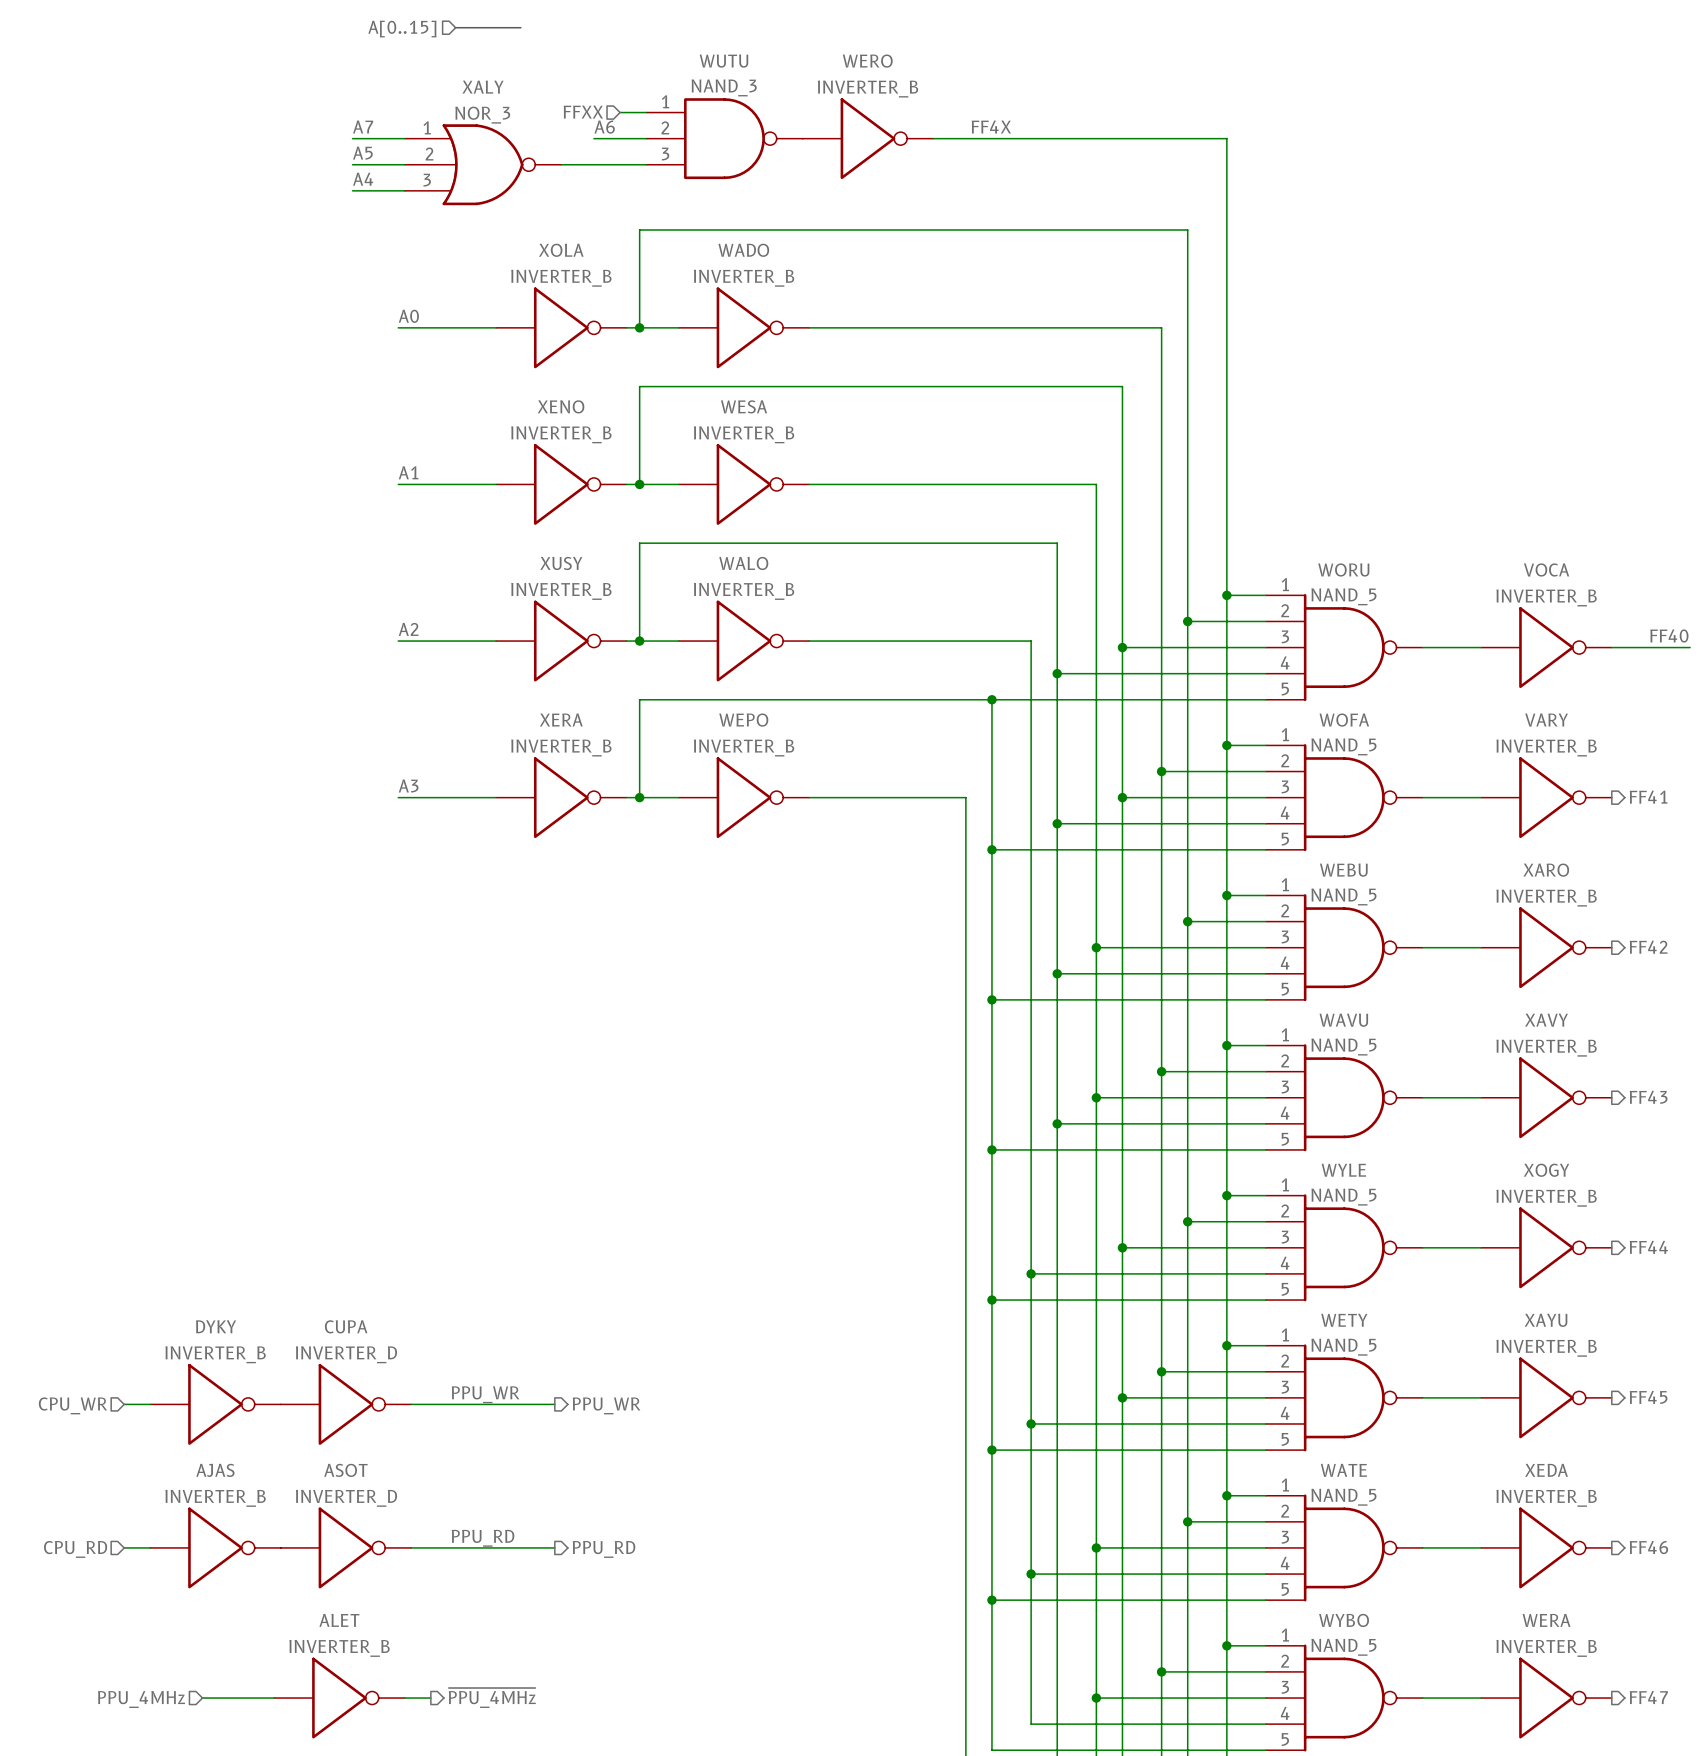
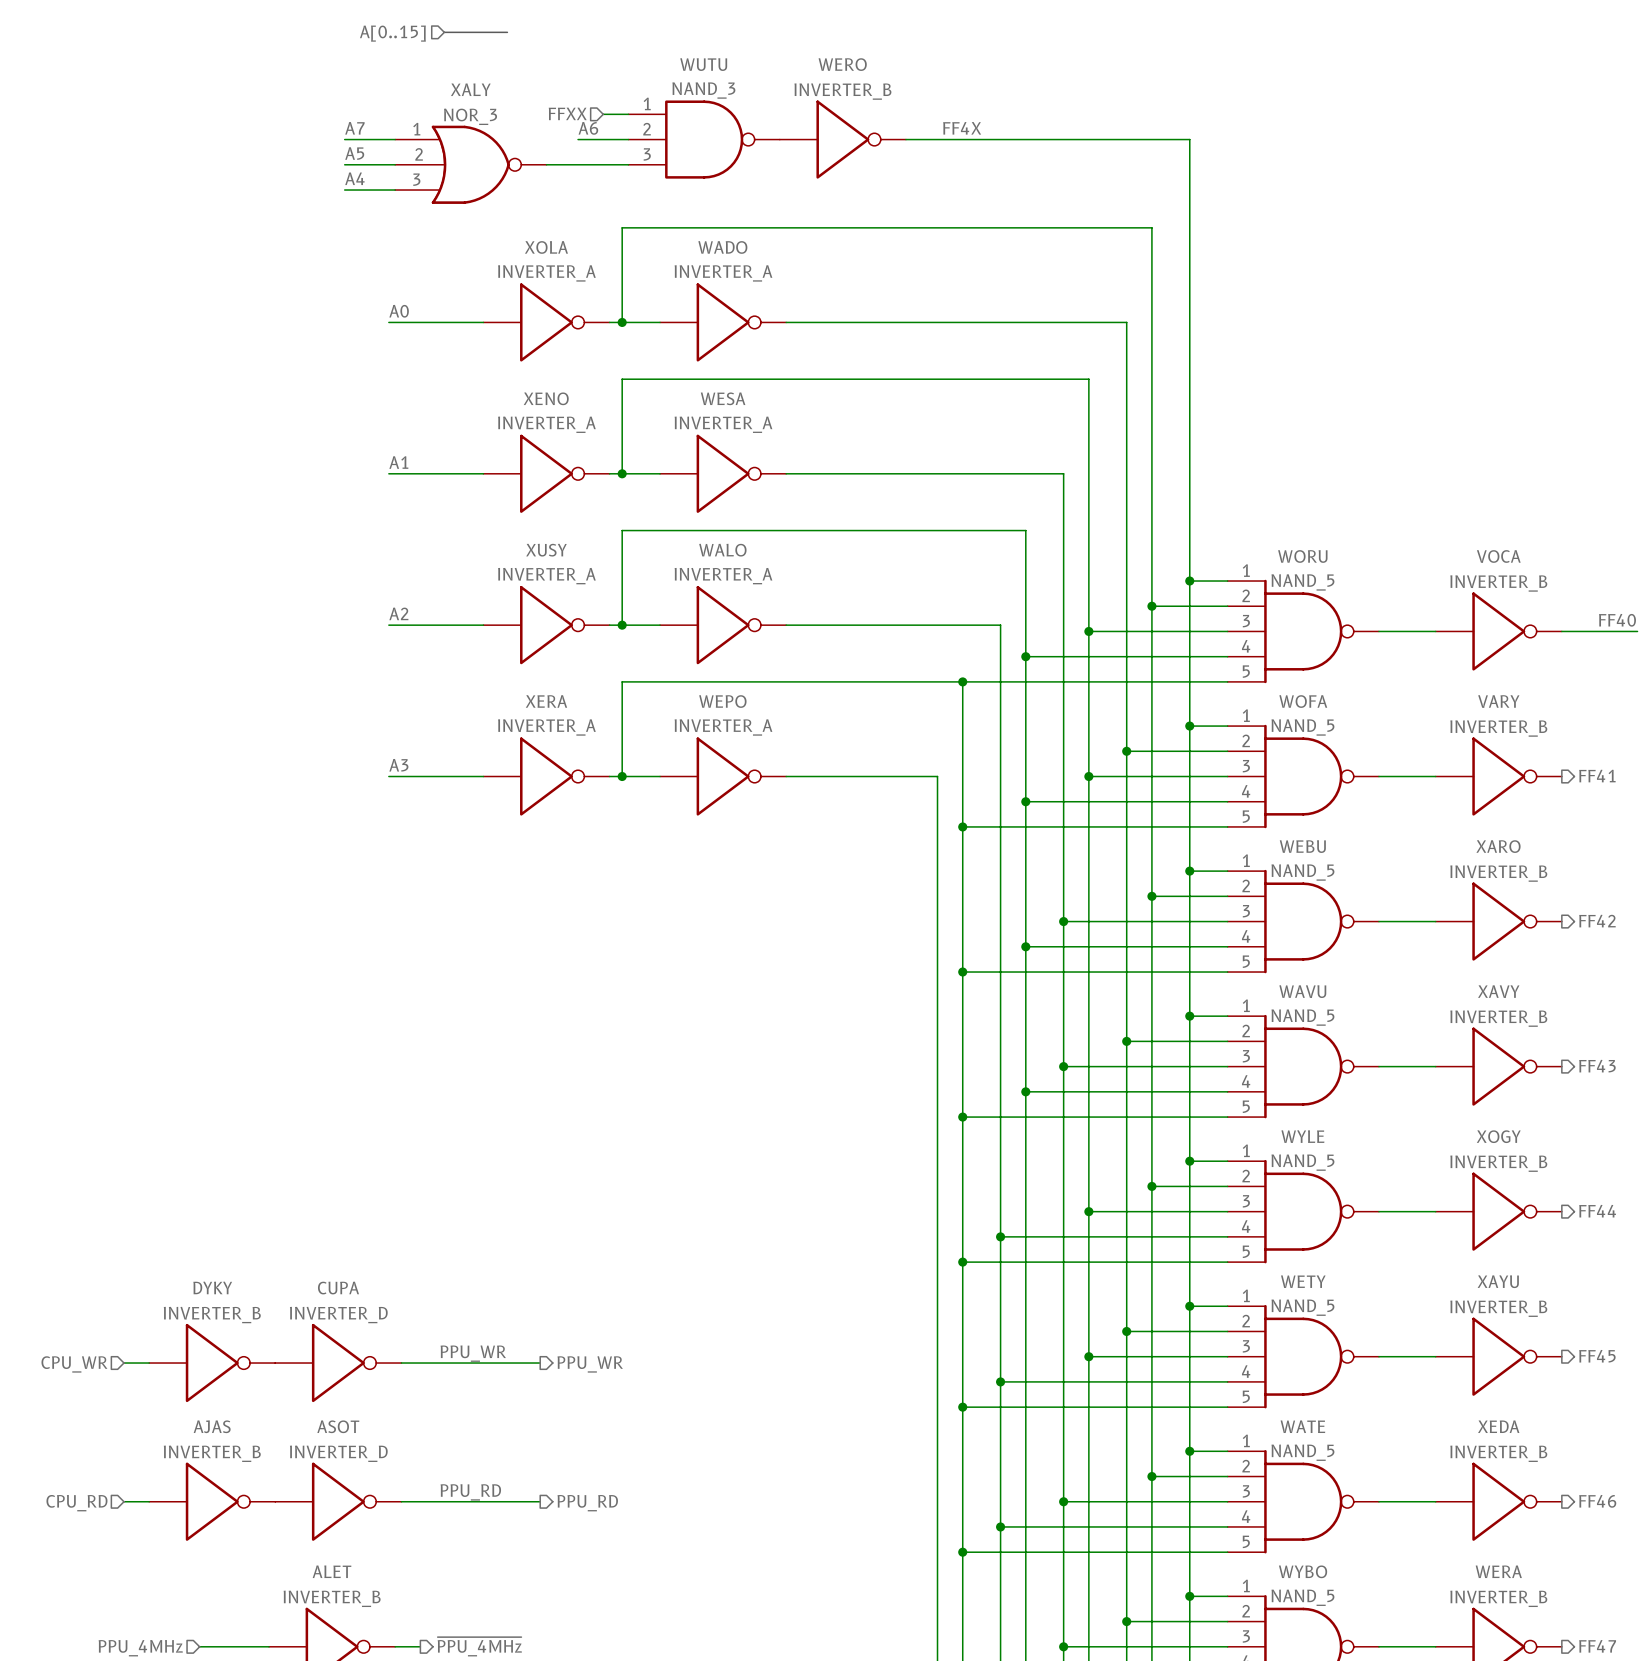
XOLA value: INVERTER_B (561, 278) -> INVERTER_A (546, 273)
WADO value: INVERTER_B (744, 278) -> INVERTER_A (723, 273)
XENO value: INVERTER_B (561, 434) -> INVERTER_A (546, 424)
WESA value: INVERTER_B (744, 434) -> INVERTER_A (723, 424)
XUSY value: INVERTER_B (561, 591) -> INVERTER_A (546, 576)
WALO value: INVERTER_B (744, 591) -> INVERTER_A (723, 576)
XERA value: INVERTER_B (561, 748) -> INVERTER_A (546, 727)
WEPO value: INVERTER_B (744, 748) -> INVERTER_A (723, 727)

